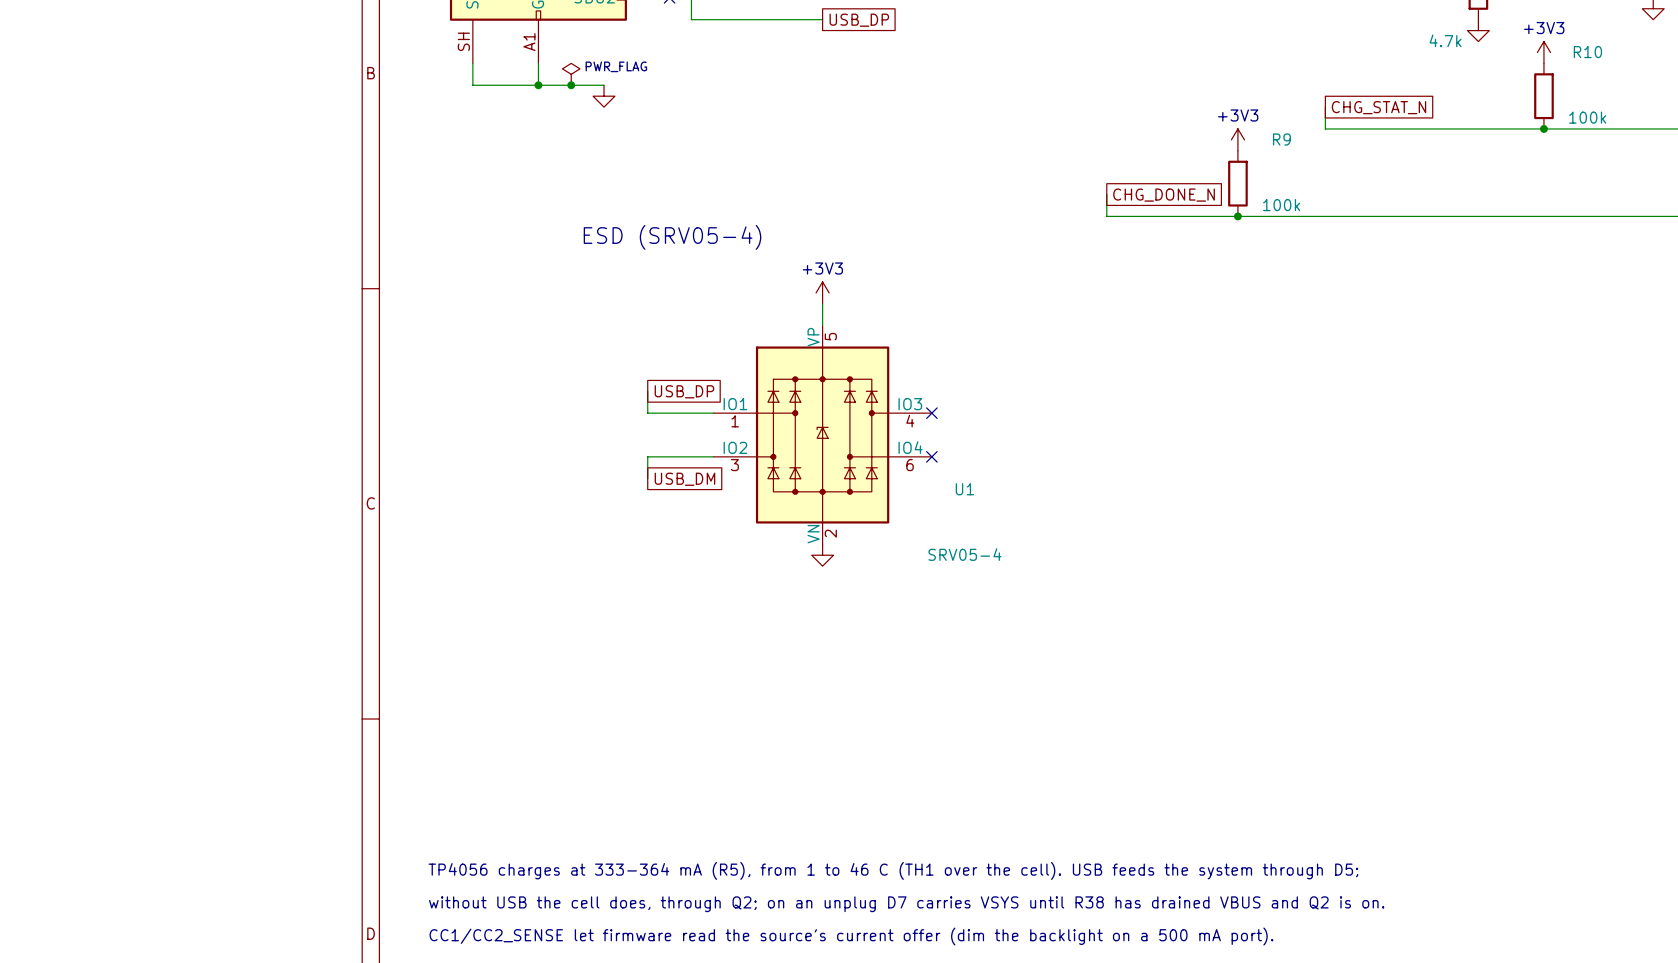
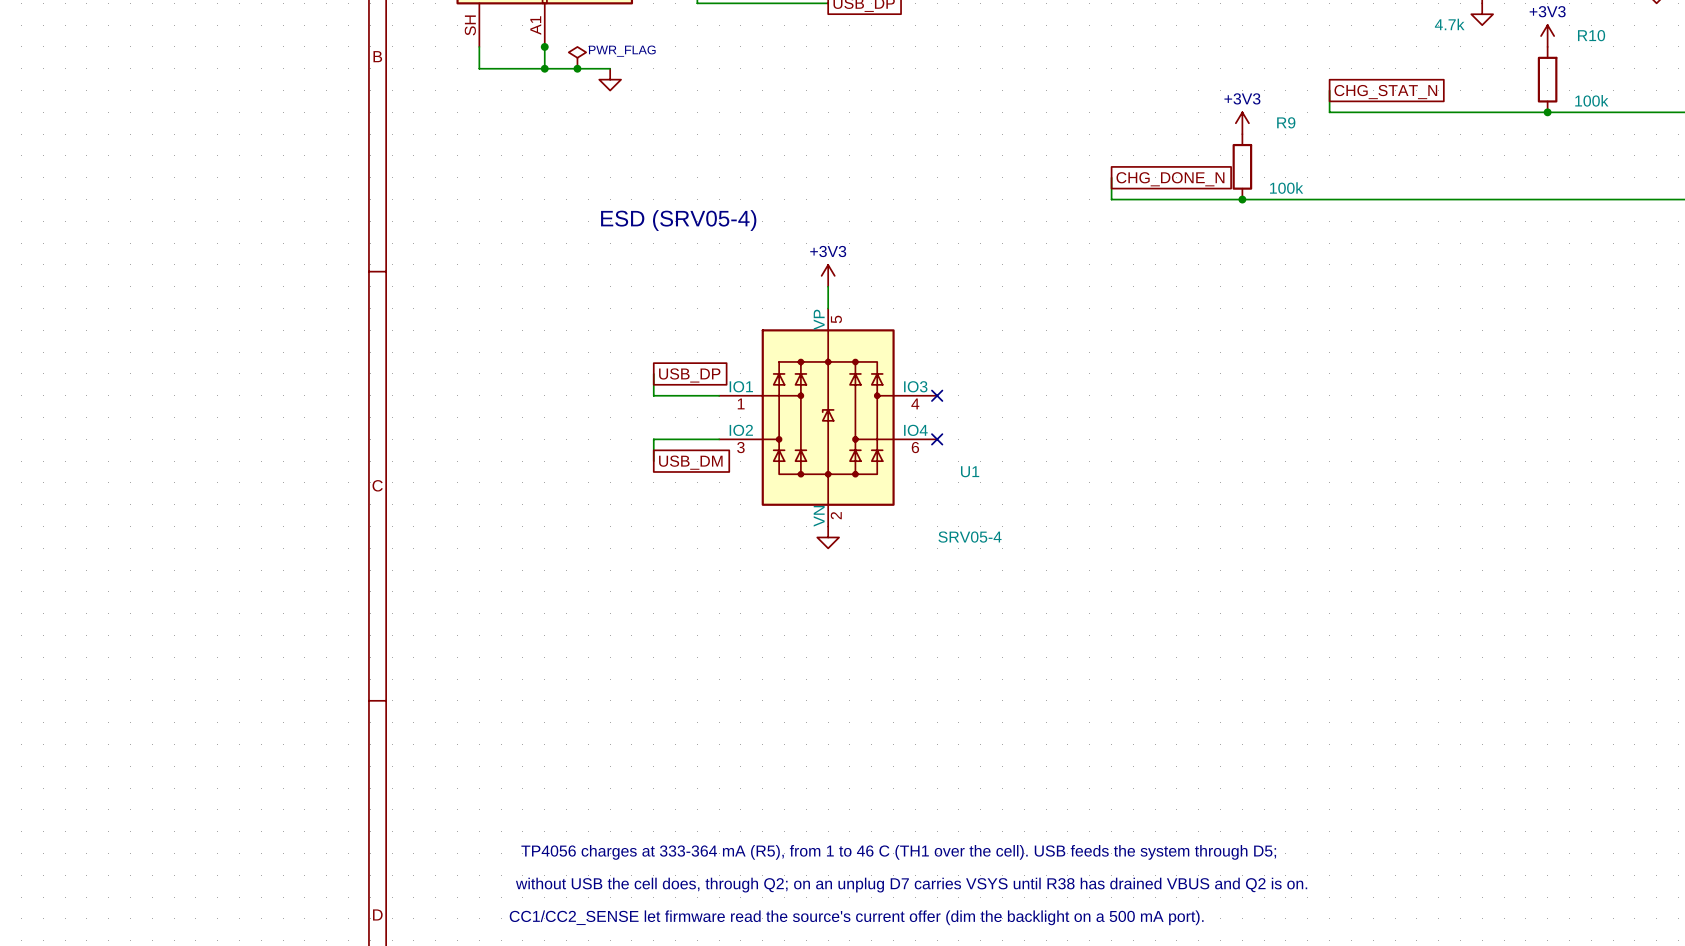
junction: none -> (544, 46)

